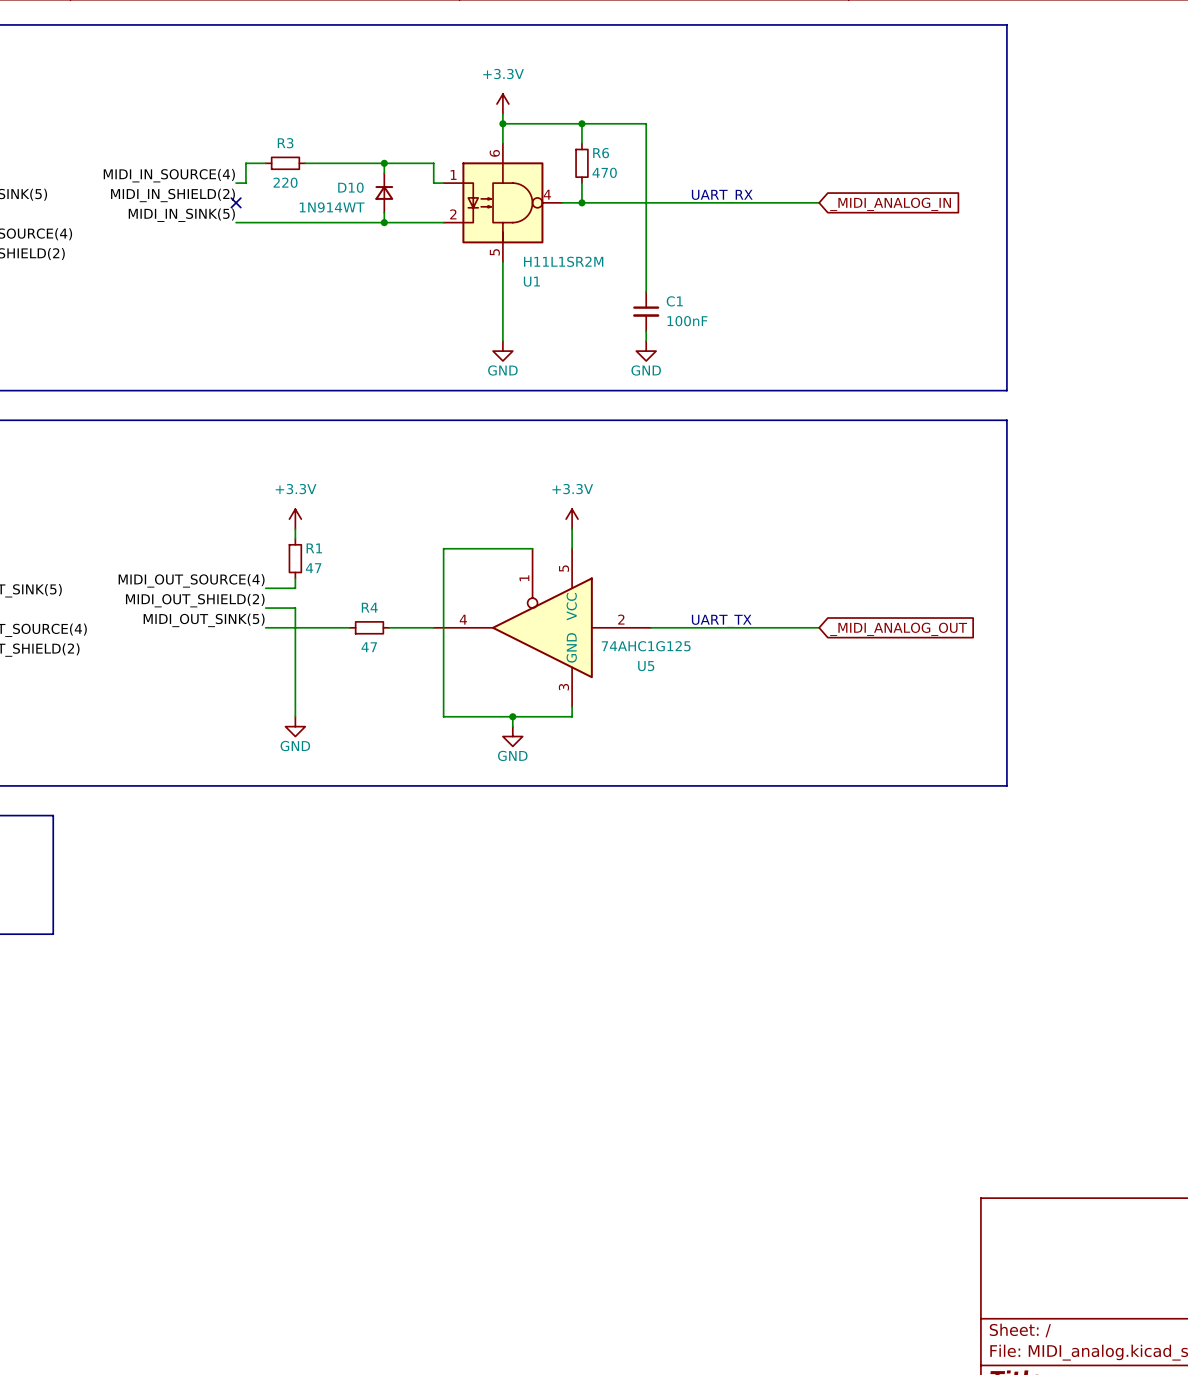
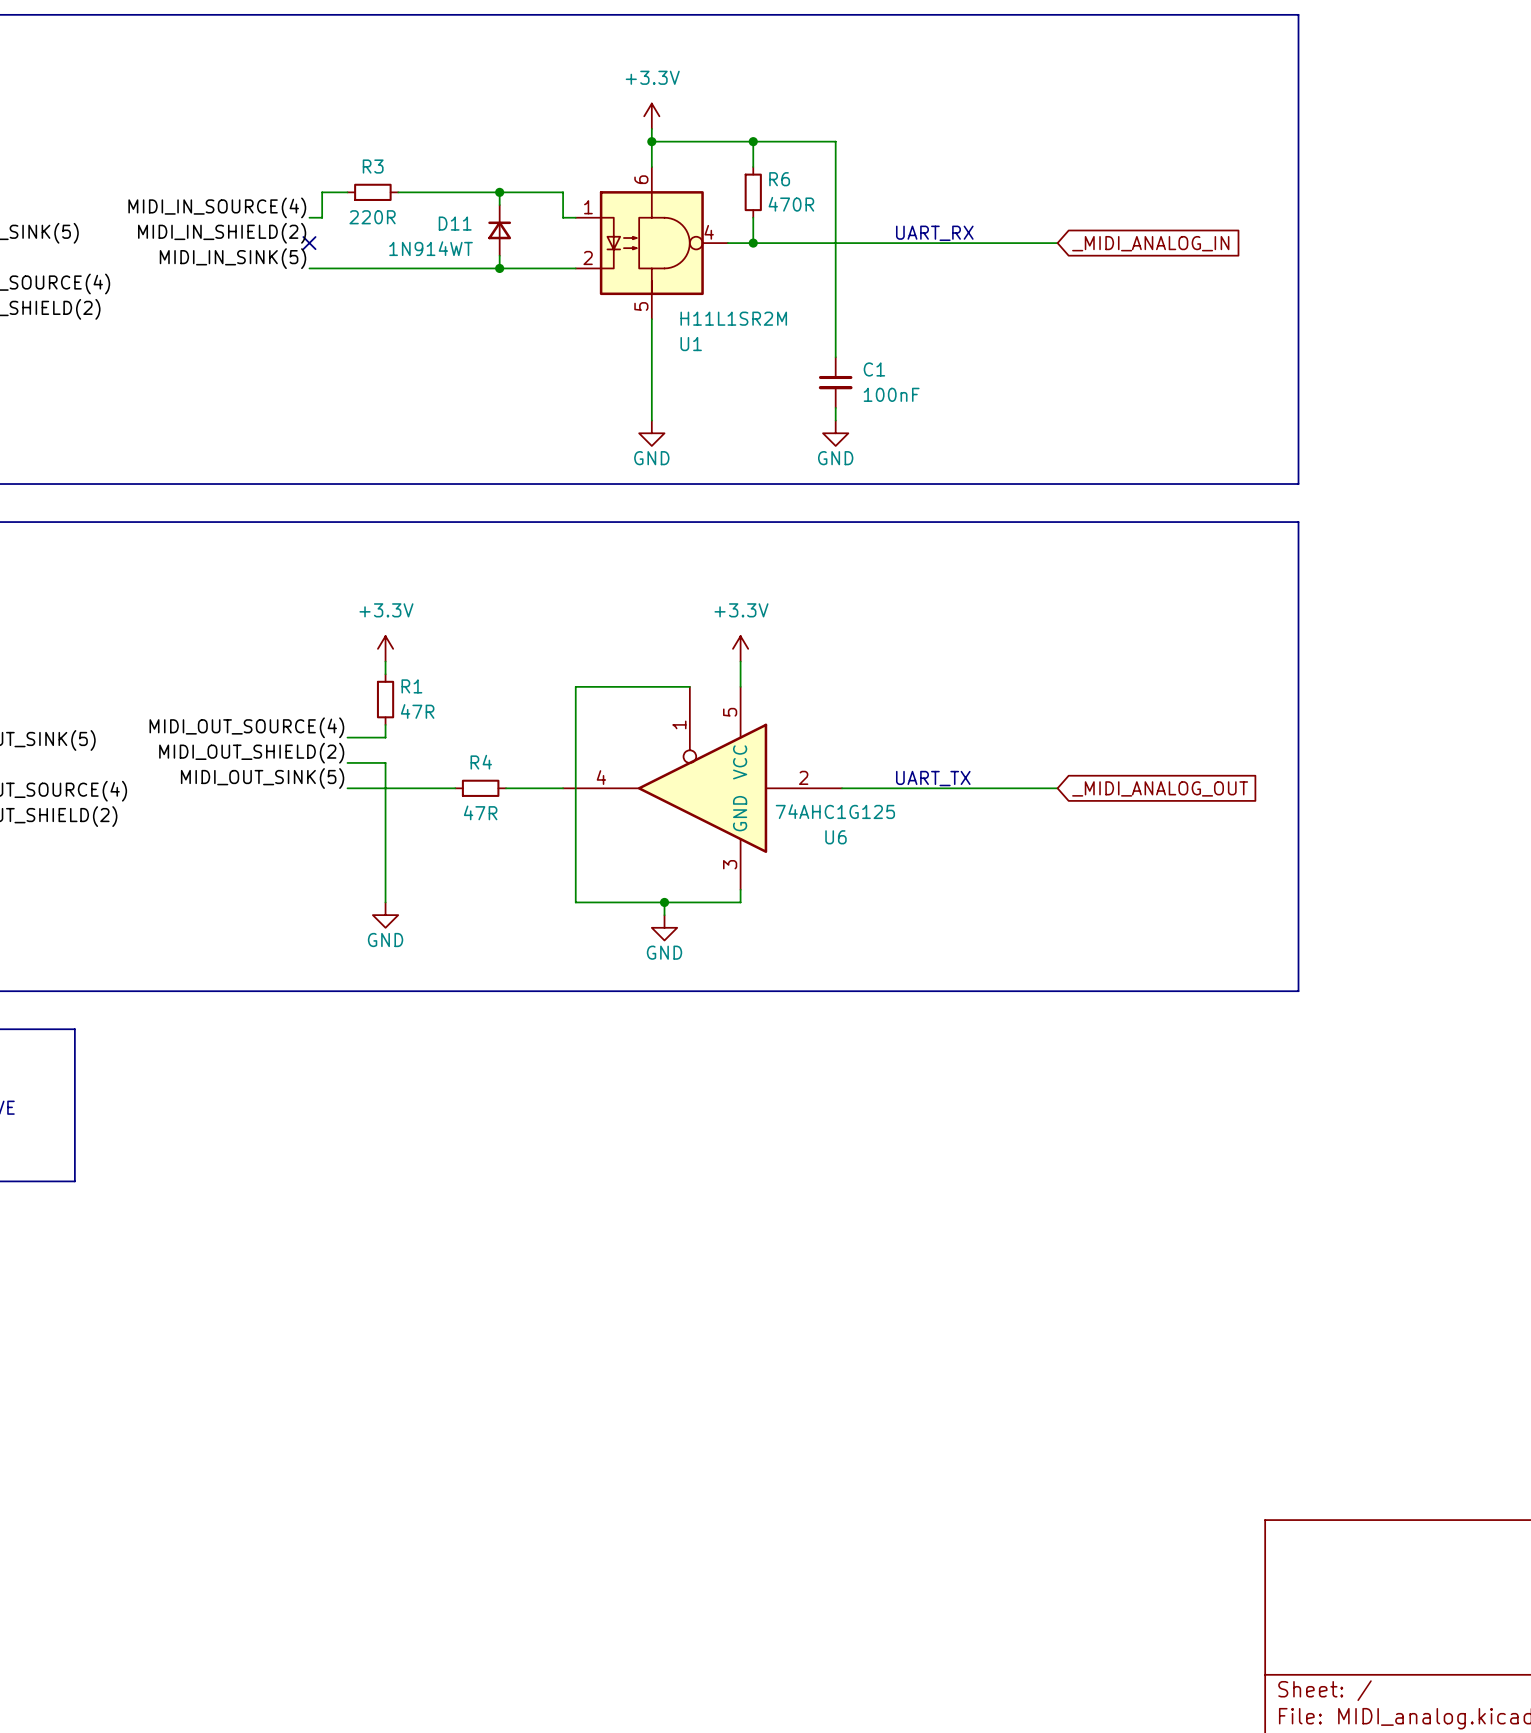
R6 value: 470 (604, 172) -> 470R (791, 204)
R3 value: 220 (285, 182) -> 220R (372, 217)
D10 name: D10 (350, 187) -> D11 (455, 223)
R1 value: 47 (313, 568) -> 47R (417, 711)
R4 value: 47 (369, 647) -> 47R (480, 812)
U5 name: U5 (646, 666) -> U6 (835, 837)

